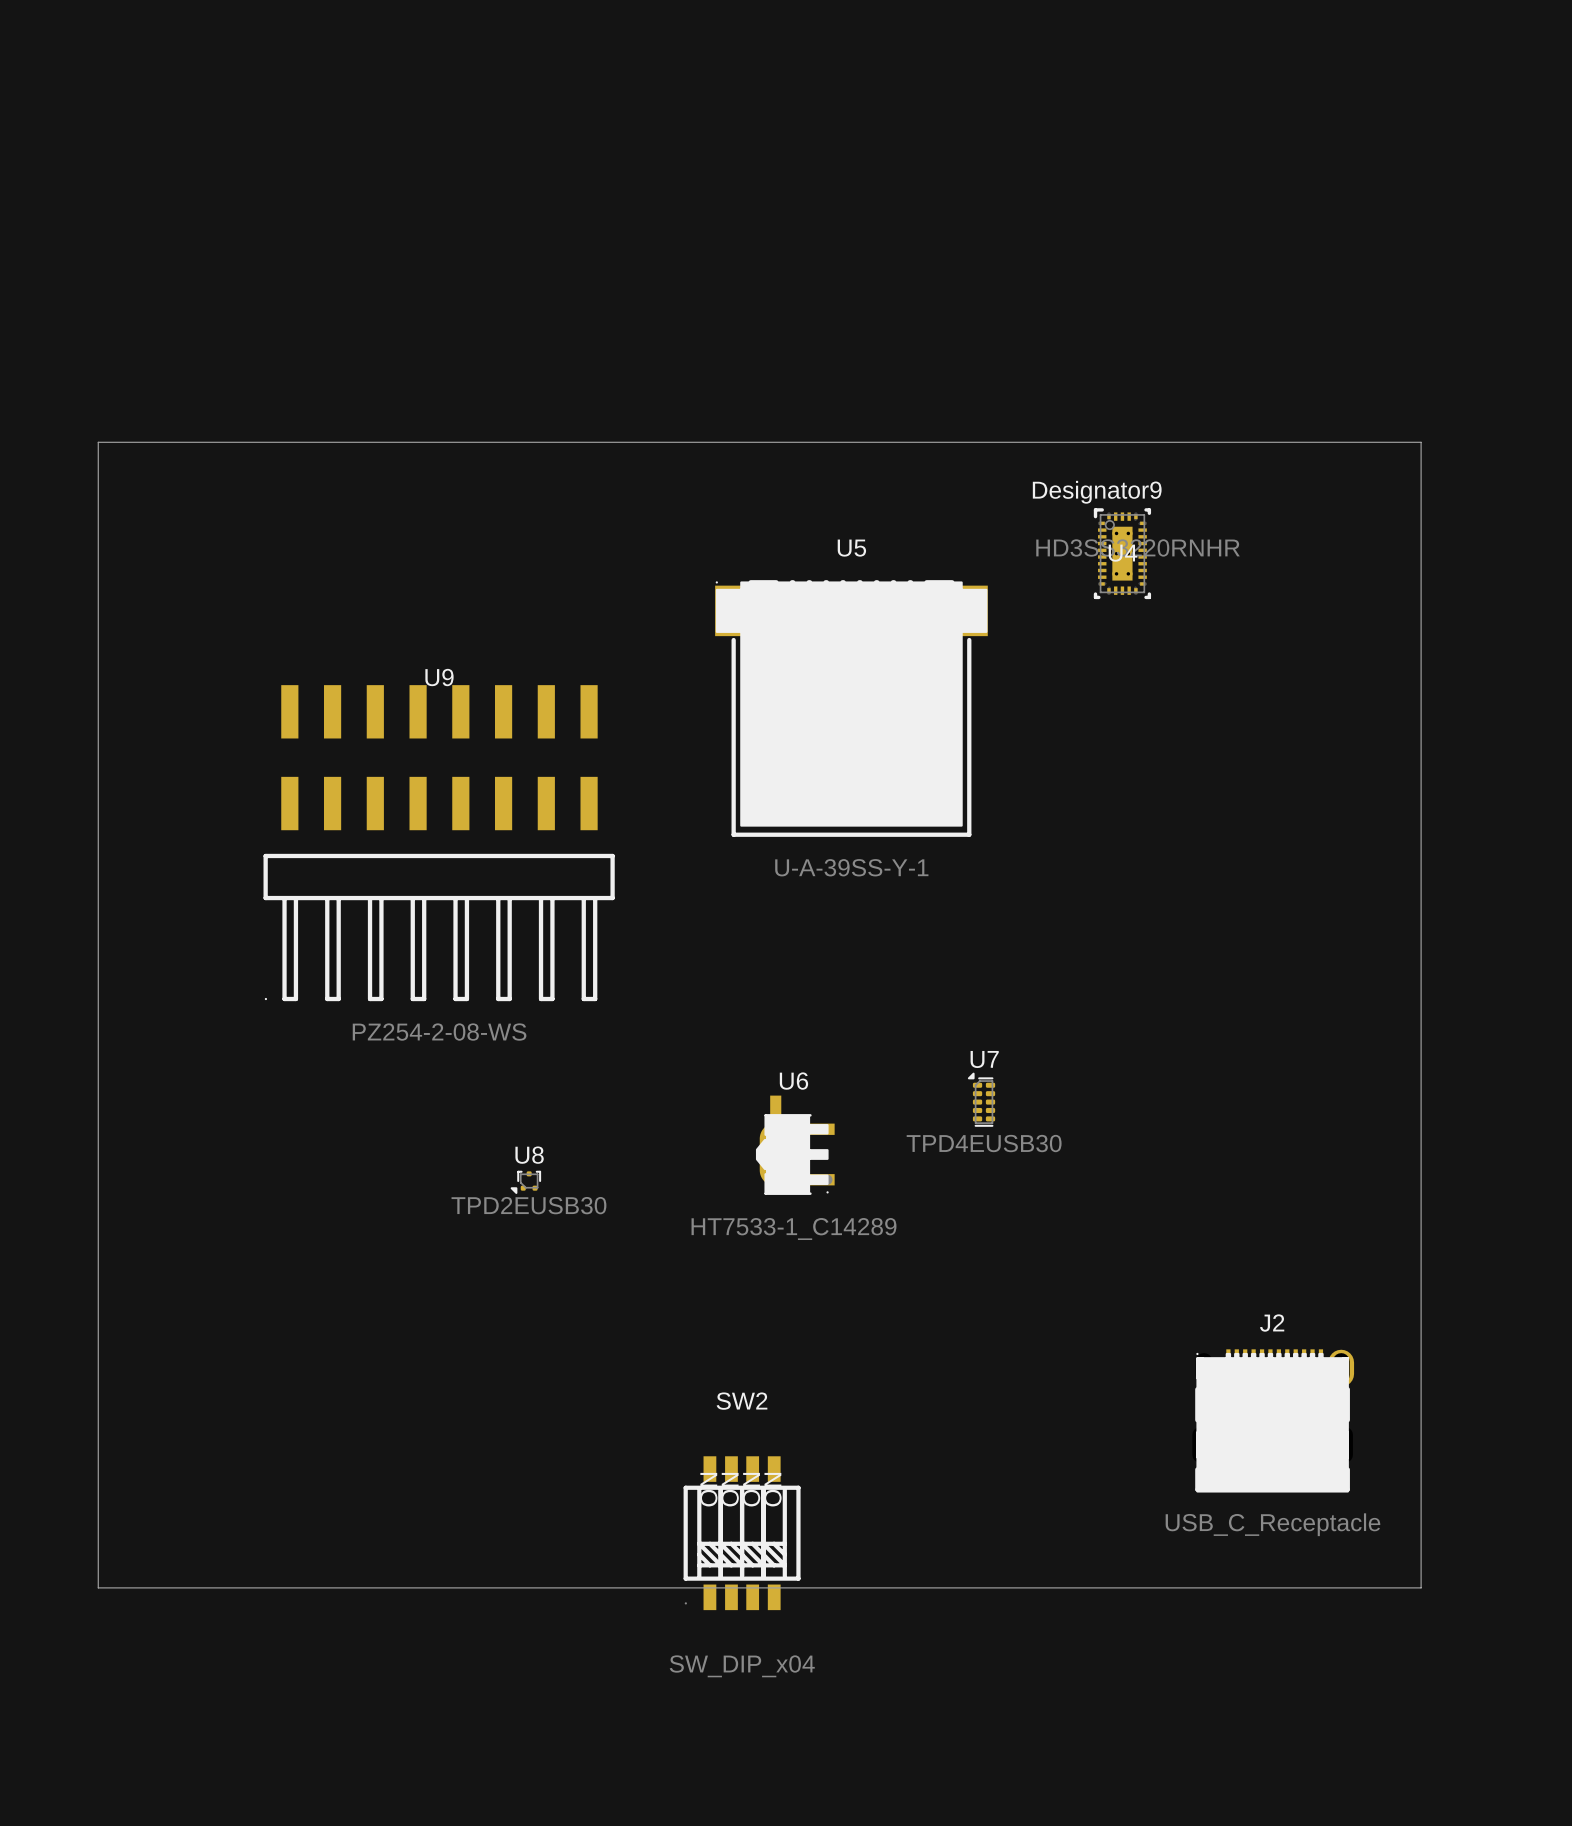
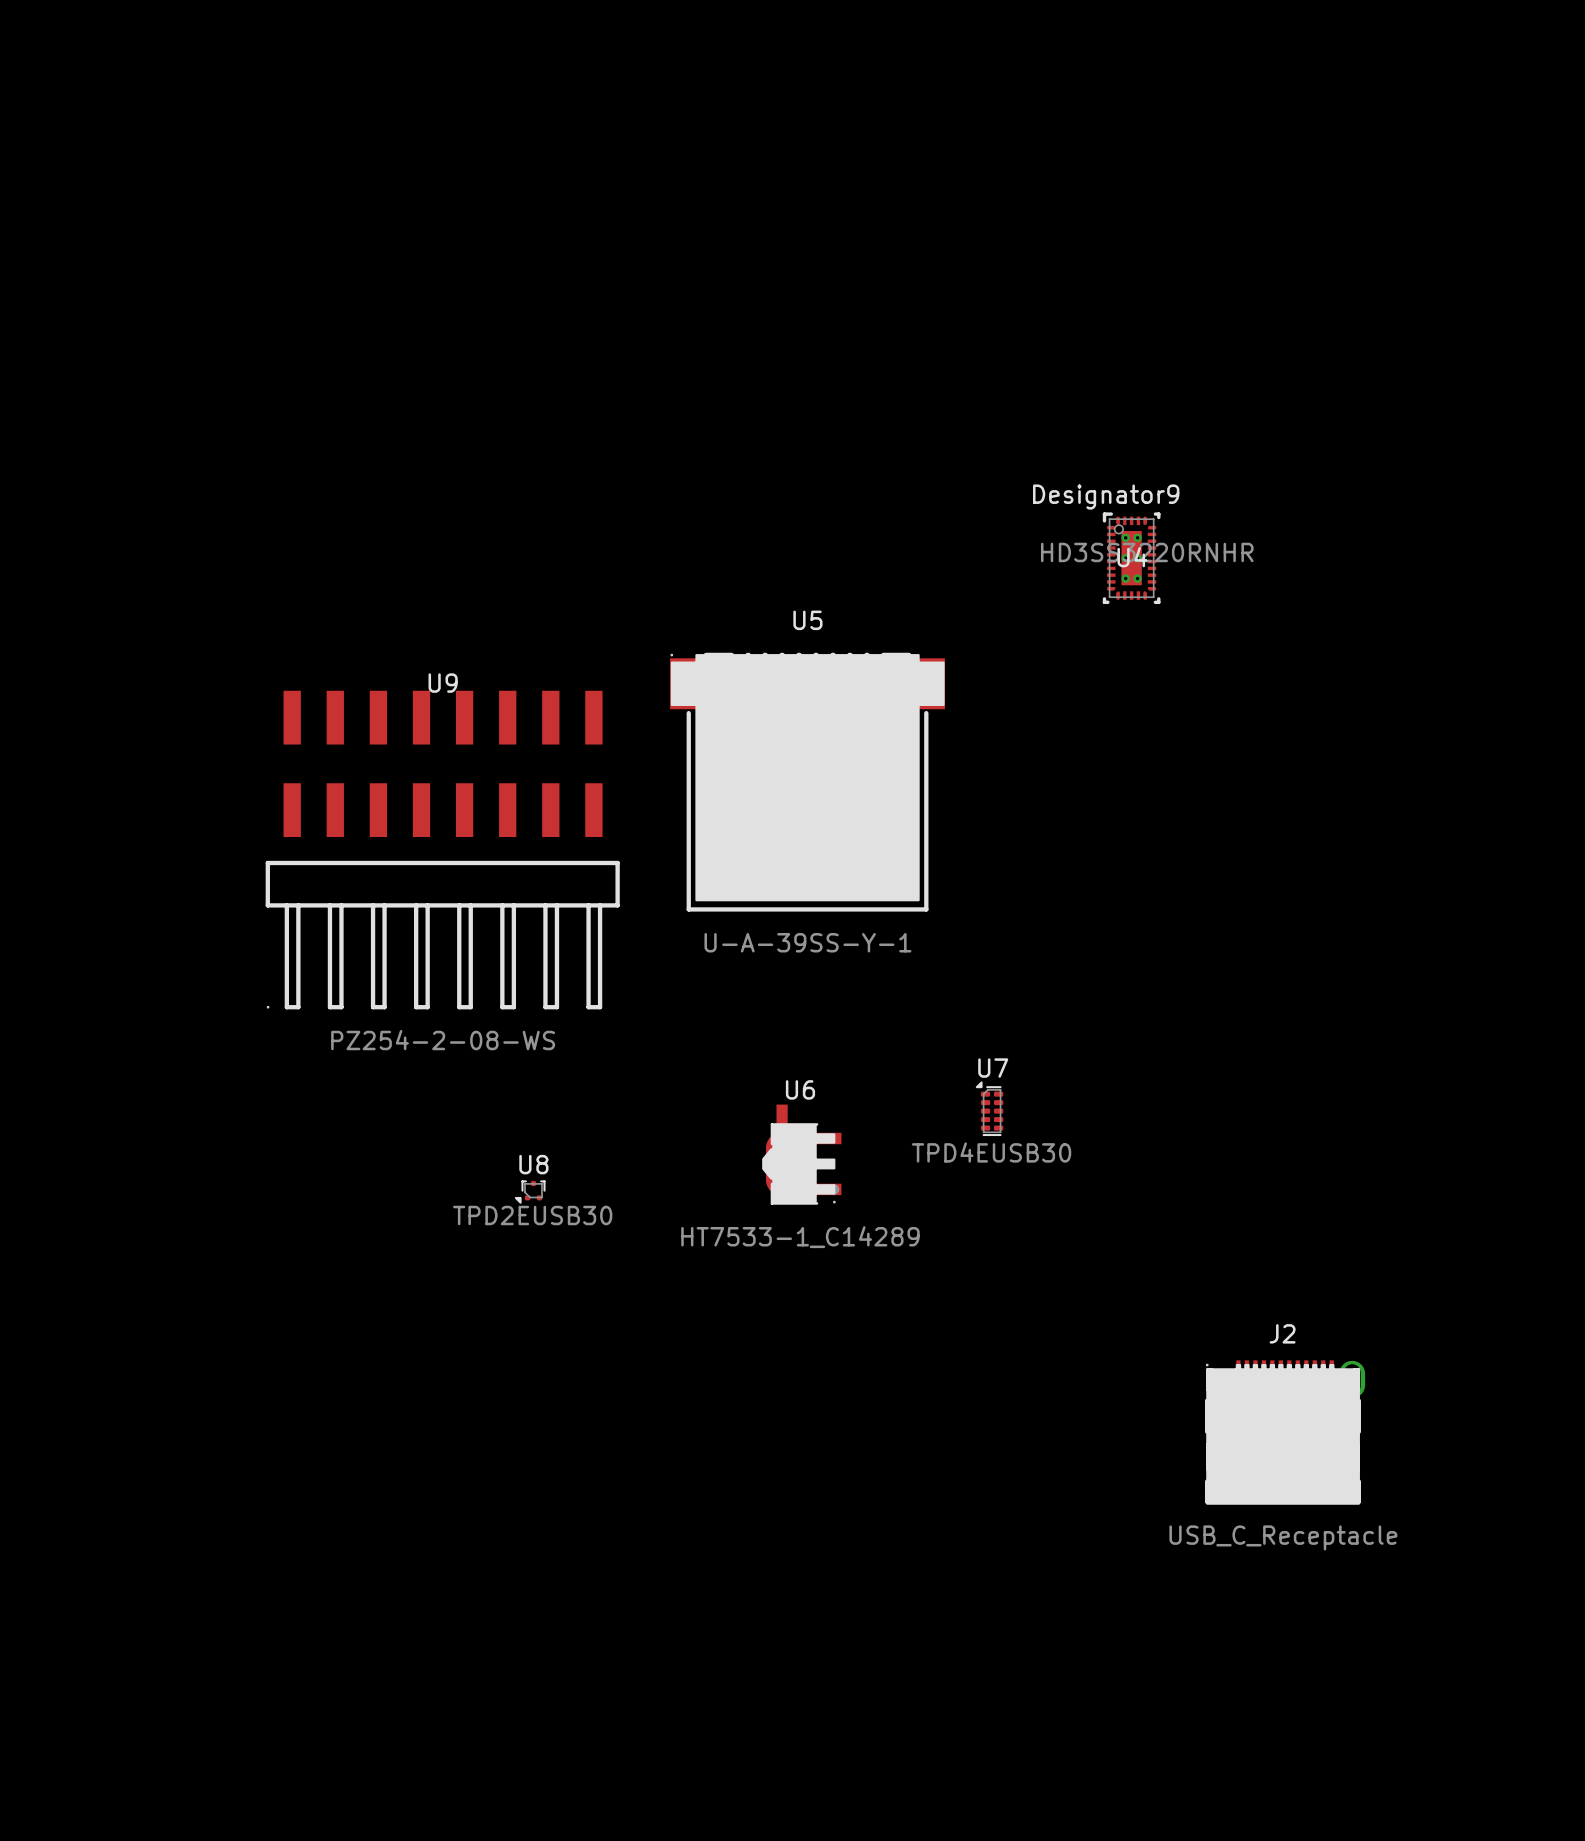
board edge: (98, 442) (1421, 442) (1421, 1587) (98, 1587) (98, 442) -> none
U5 position: (851, 708) -> (807, 782)
SW2: SW_DIP_x04 (742, 1533) -> none

